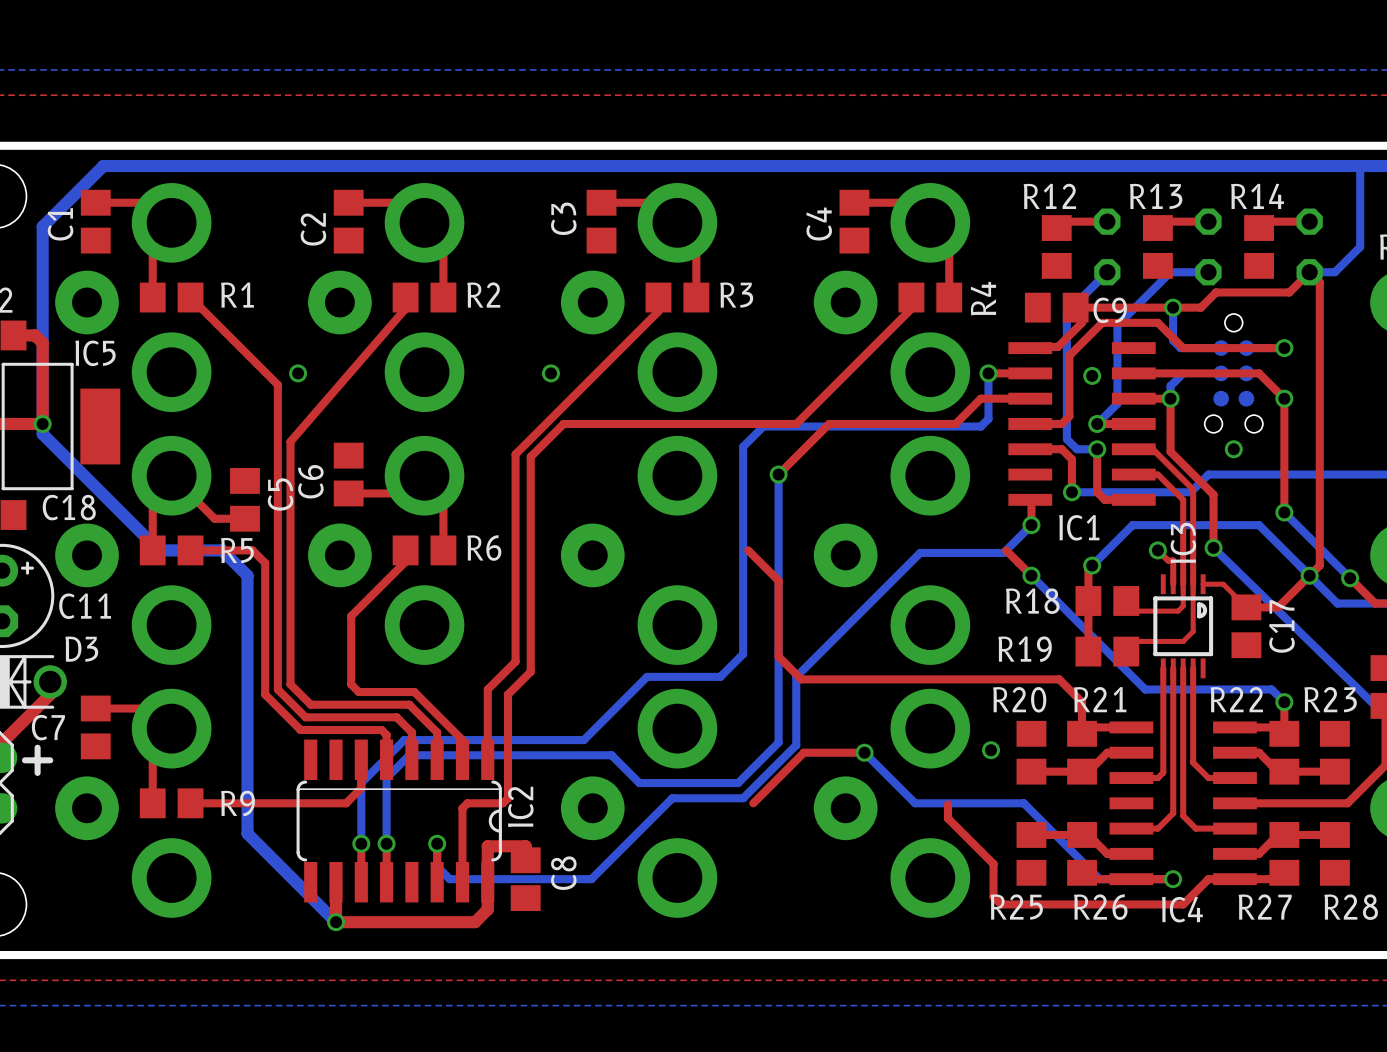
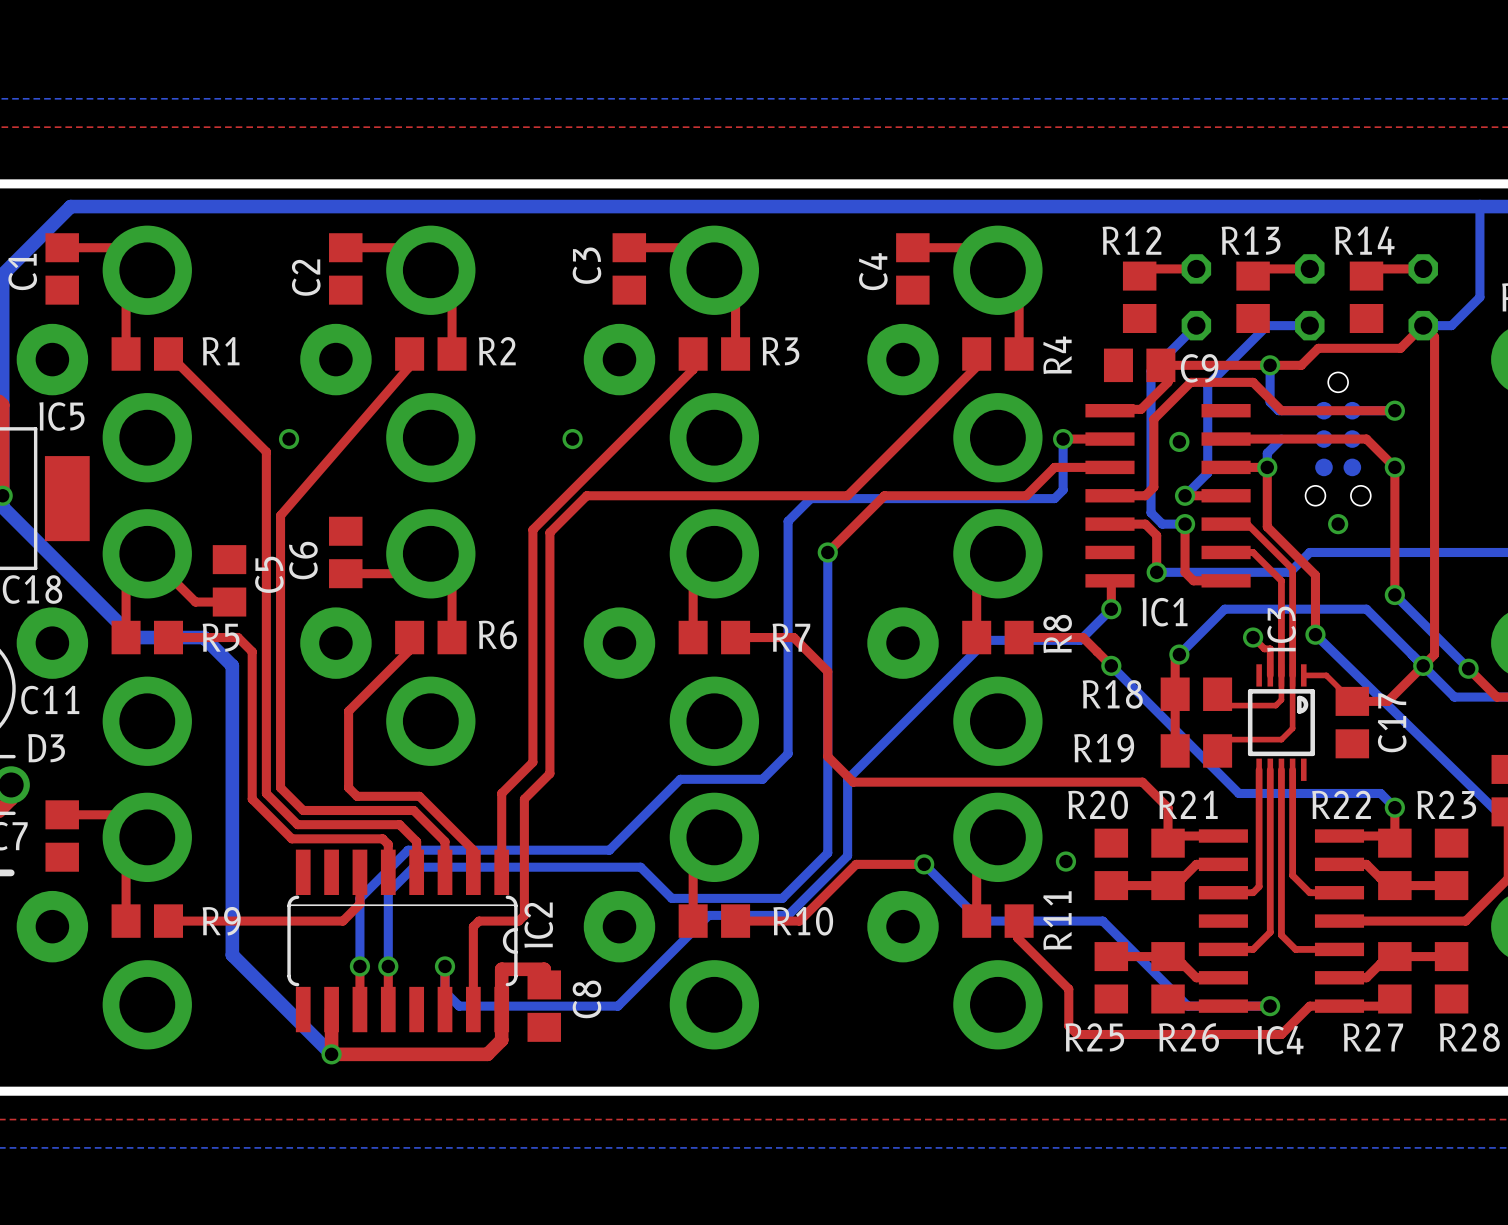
top track: none -> (693, 575) (693, 637)
top track: none -> (976, 575) (976, 637)
R7: none -> (714, 637)
top track: none -> (735, 637) (793, 637)
R8: none -> (997, 637)
top track: none -> (1019, 637) (1082, 637)
top track: none -> (693, 858) (693, 921)
top track: none -> (976, 858) (976, 921)
R10: none -> (714, 921)
top track: none -> (735, 921) (799, 921)
R11: none -> (997, 921)

